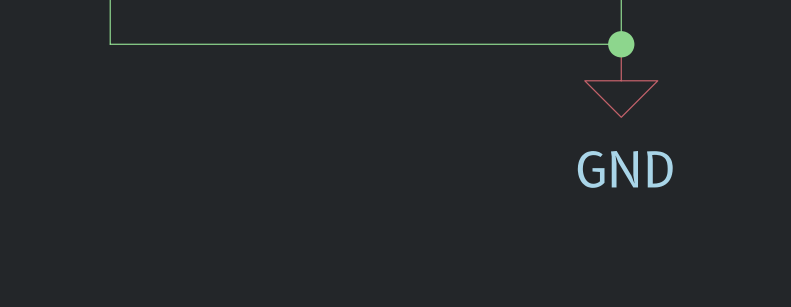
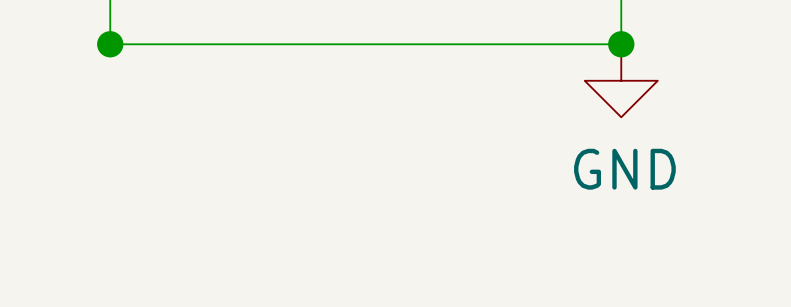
junction: none -> (110, 44)

